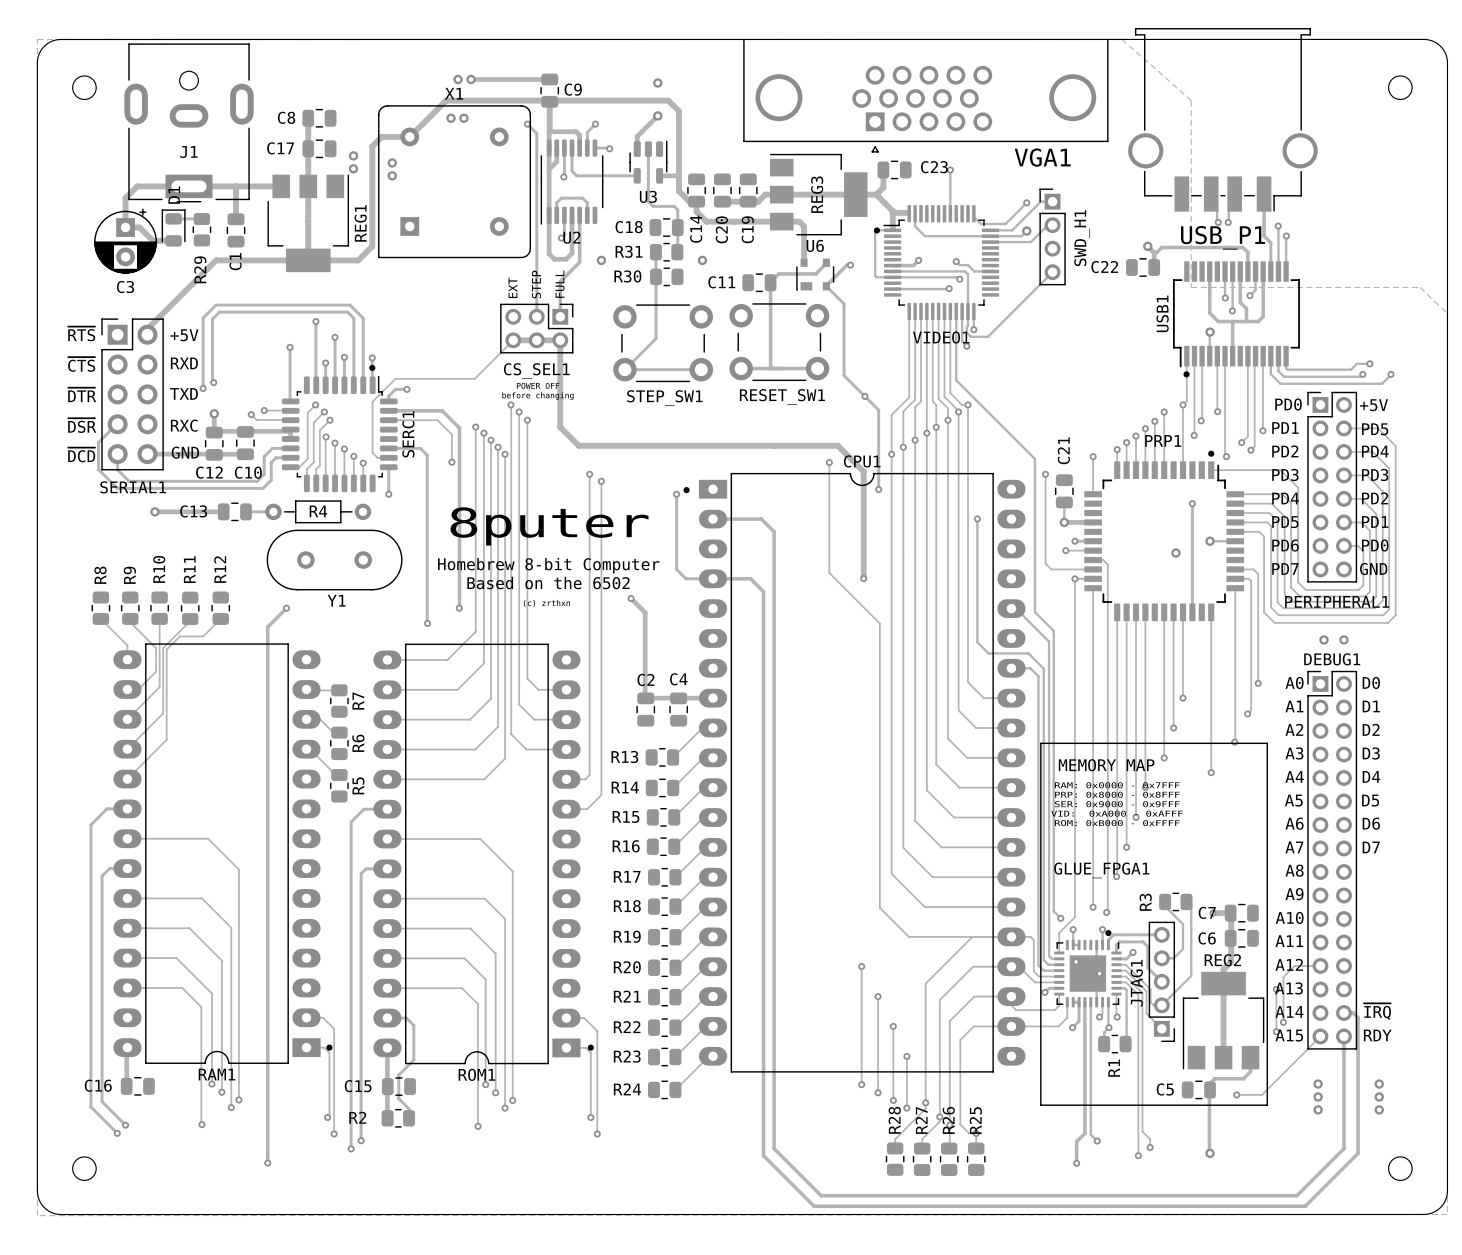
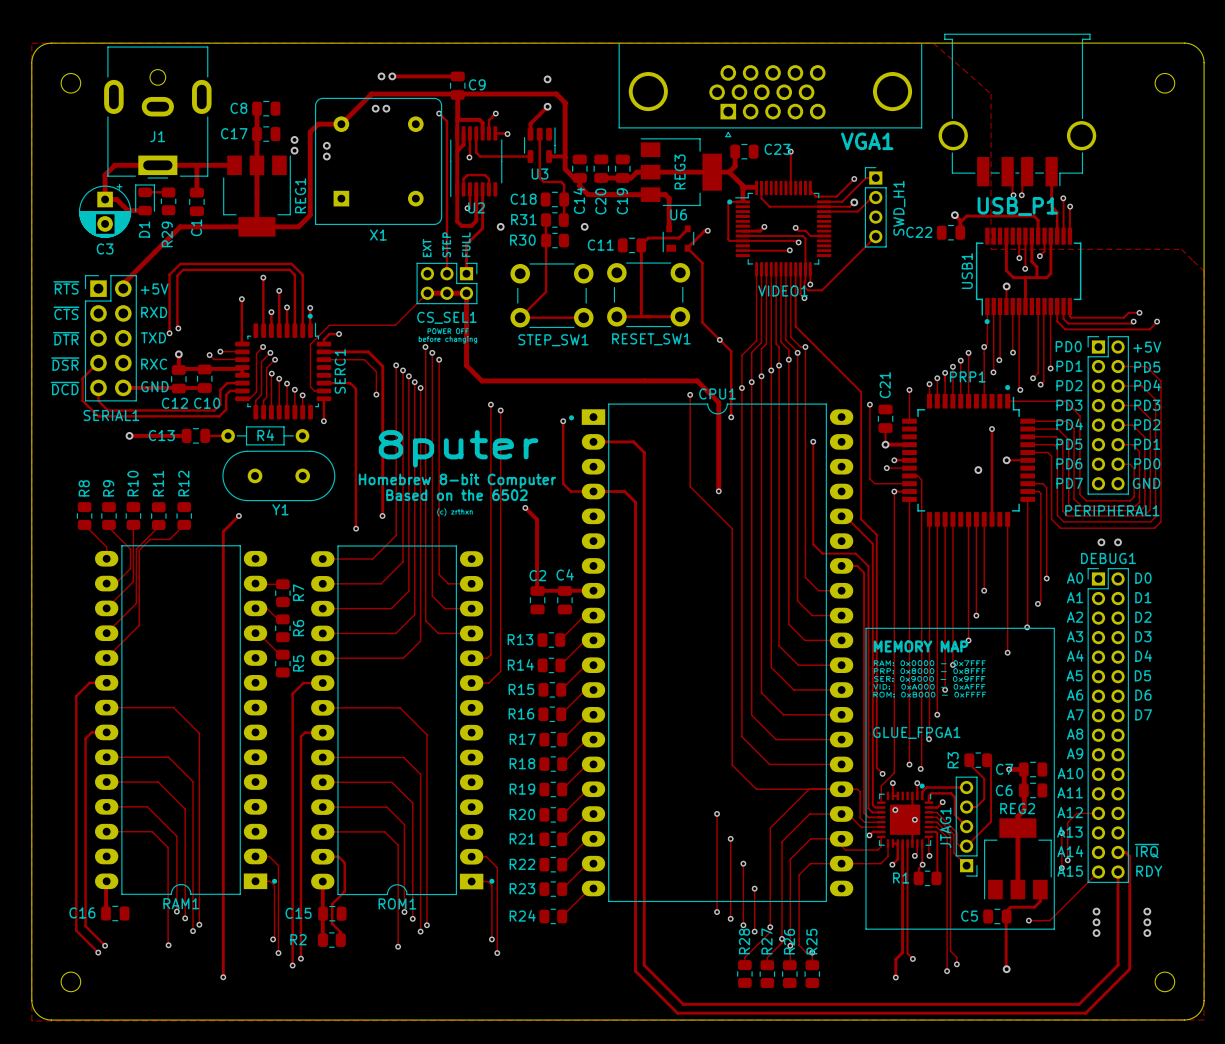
X1 name position: X1 (454, 93) -> X1 (378, 235)
D1 name position: D1 (174, 195) -> D1 (144, 229)
R1 name rotation: 0° (1114, 1068) -> 90° clockwise (901, 878)
R1 name position: R1 (1114, 1068) -> R1 (901, 878)

